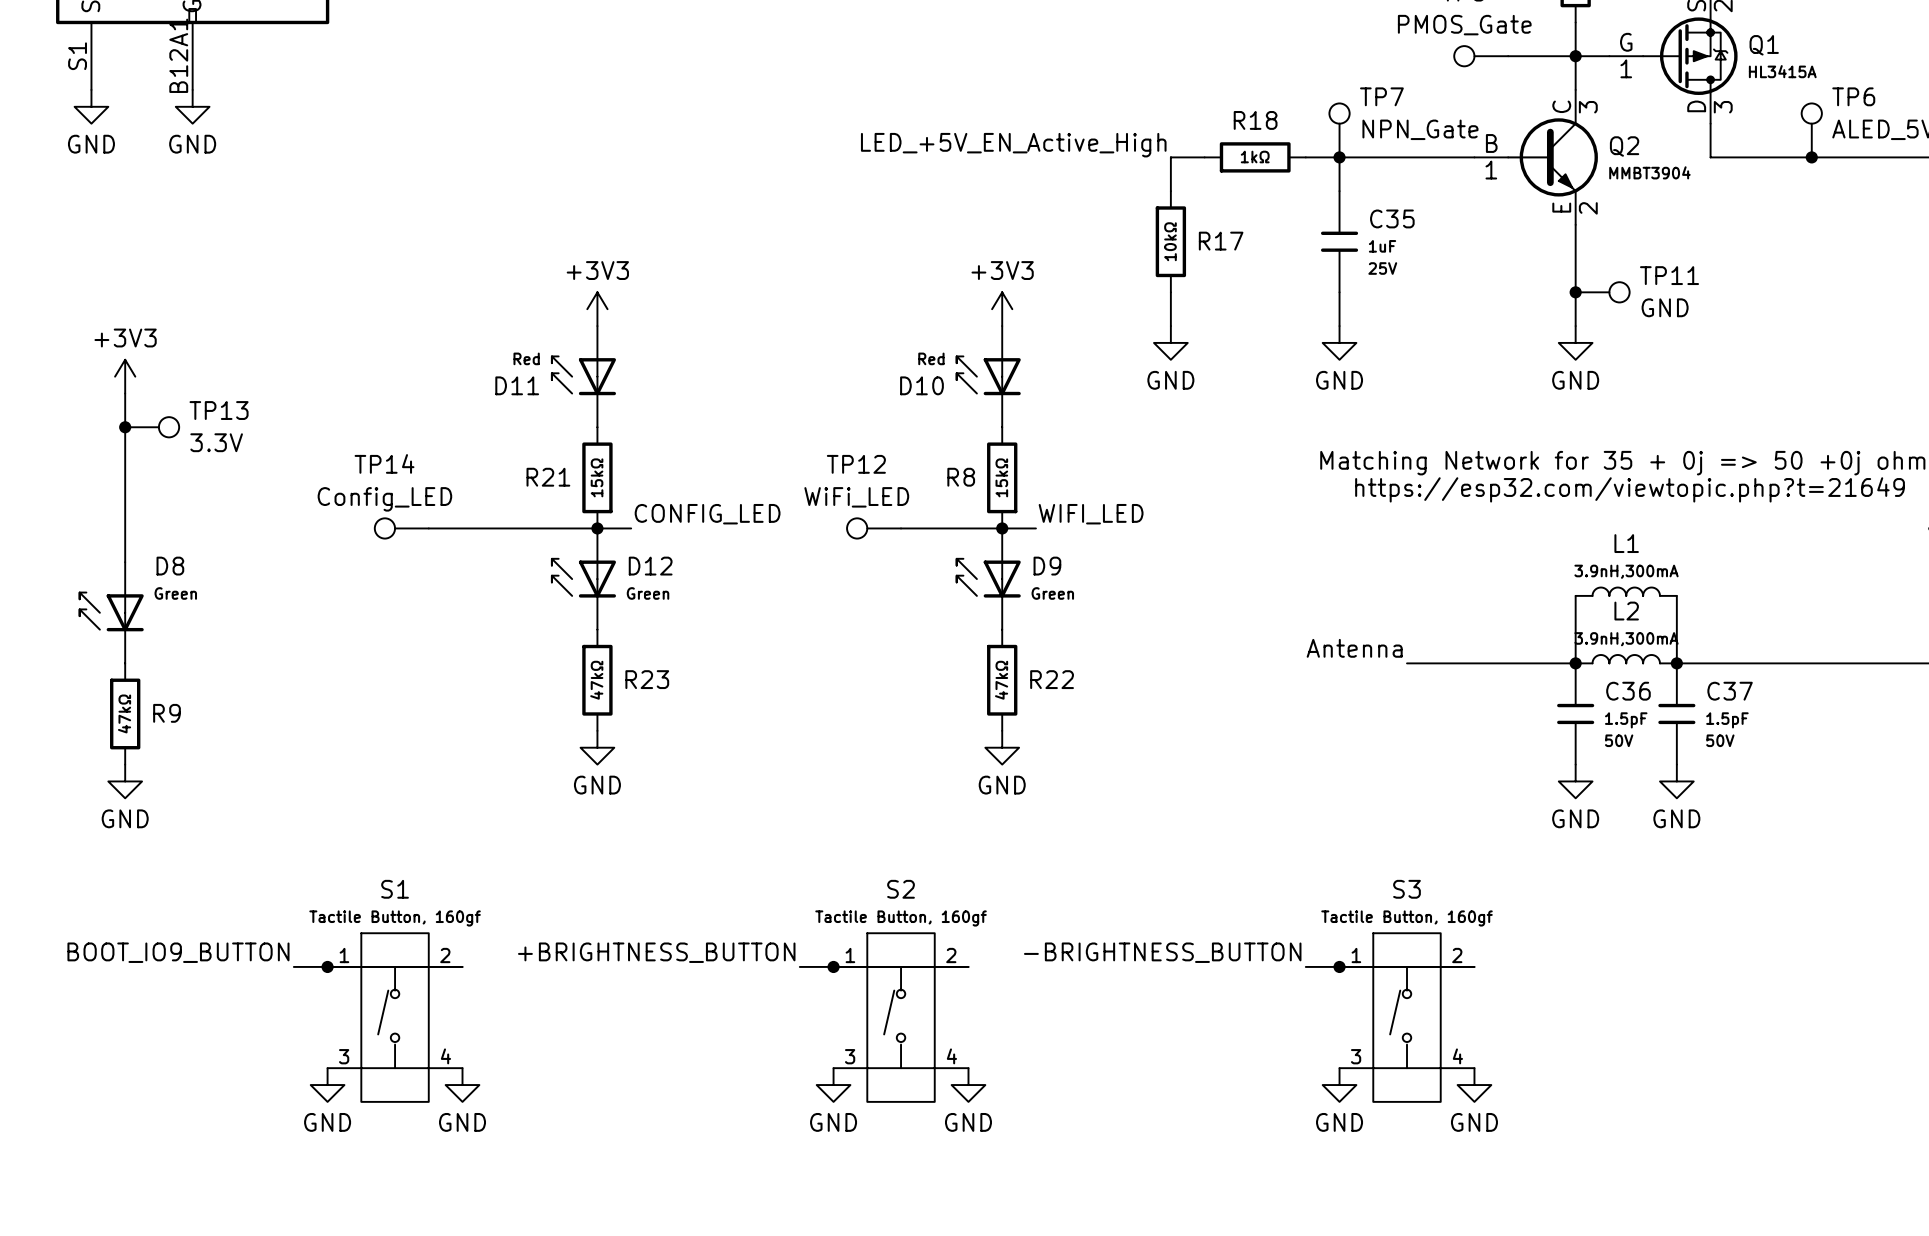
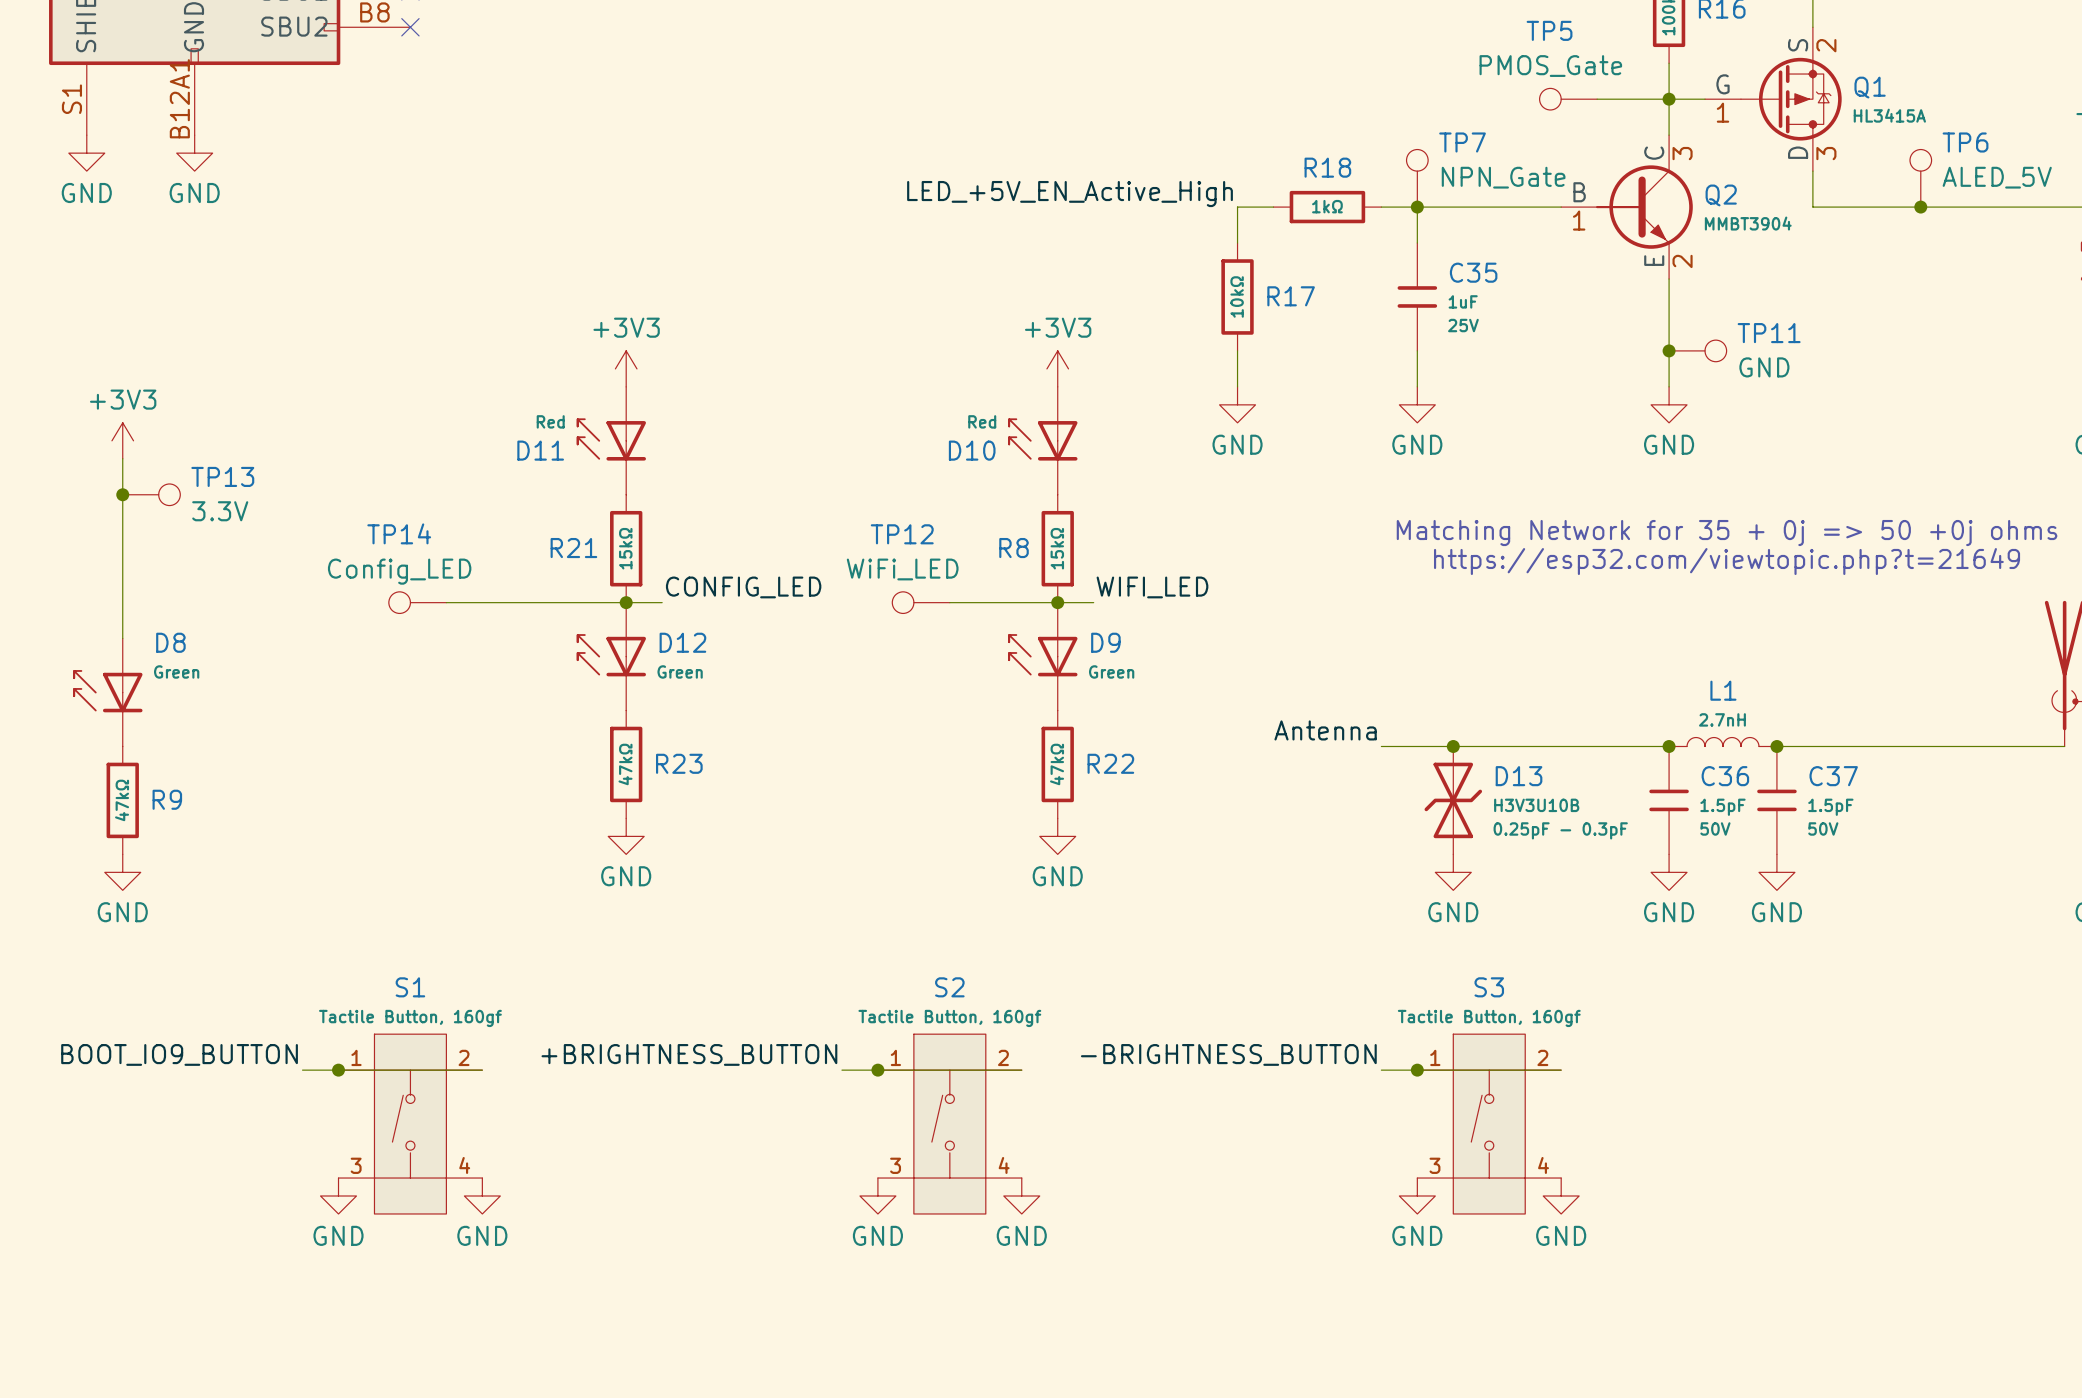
L1: 3.9nH,300mA (1626, 591) -> none
wire: (1575, 595) (1575, 663) -> none
wire: (1676, 595) (1676, 663) -> none
L2 name: L2 (1626, 611) -> L1 (1723, 690)
L2 value: 3.9nH,300mA (1626, 639) -> 2.7nH (1722, 719)
label position: Antenna (1354, 648) -> Antenna (1325, 730)
wire: none -> (1381, 746) (1489, 746)
junction: none -> (1453, 746)
D13: none -> H3V3U10B (1453, 800)
power symbol: none -> GND (1453, 872)

